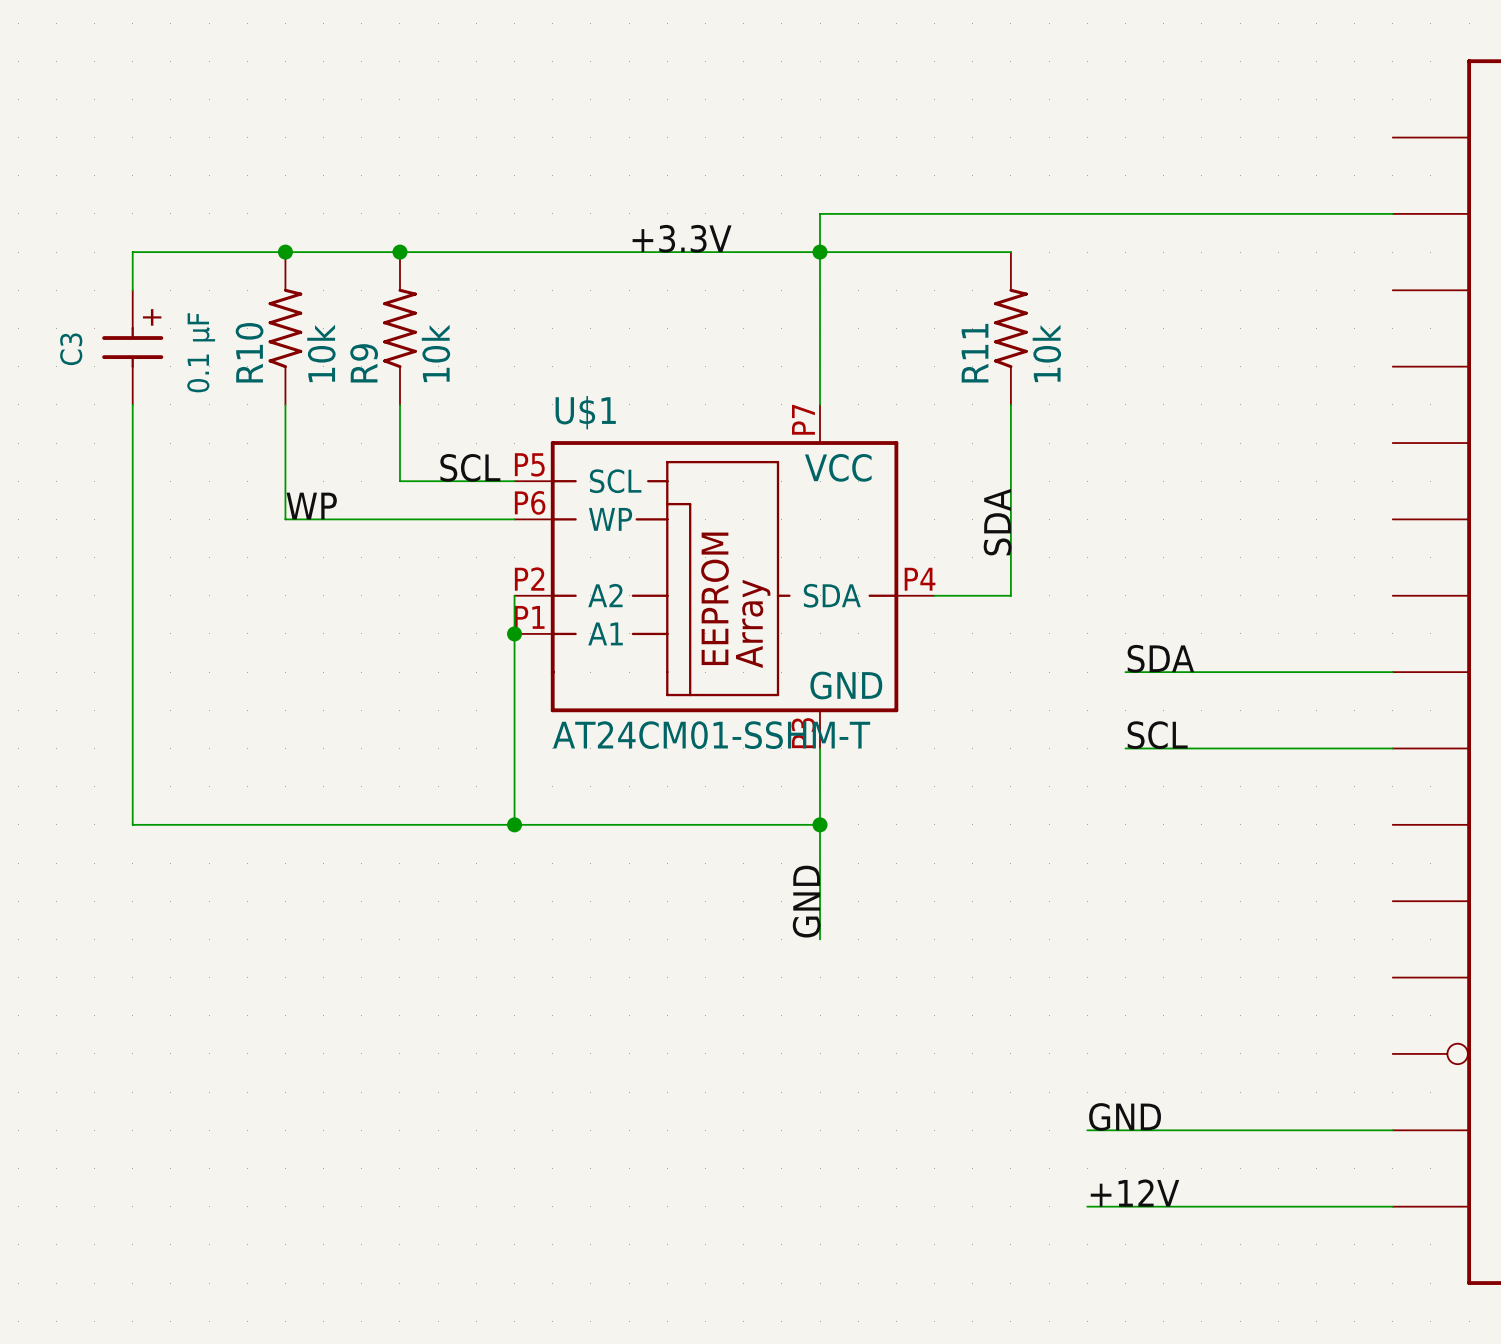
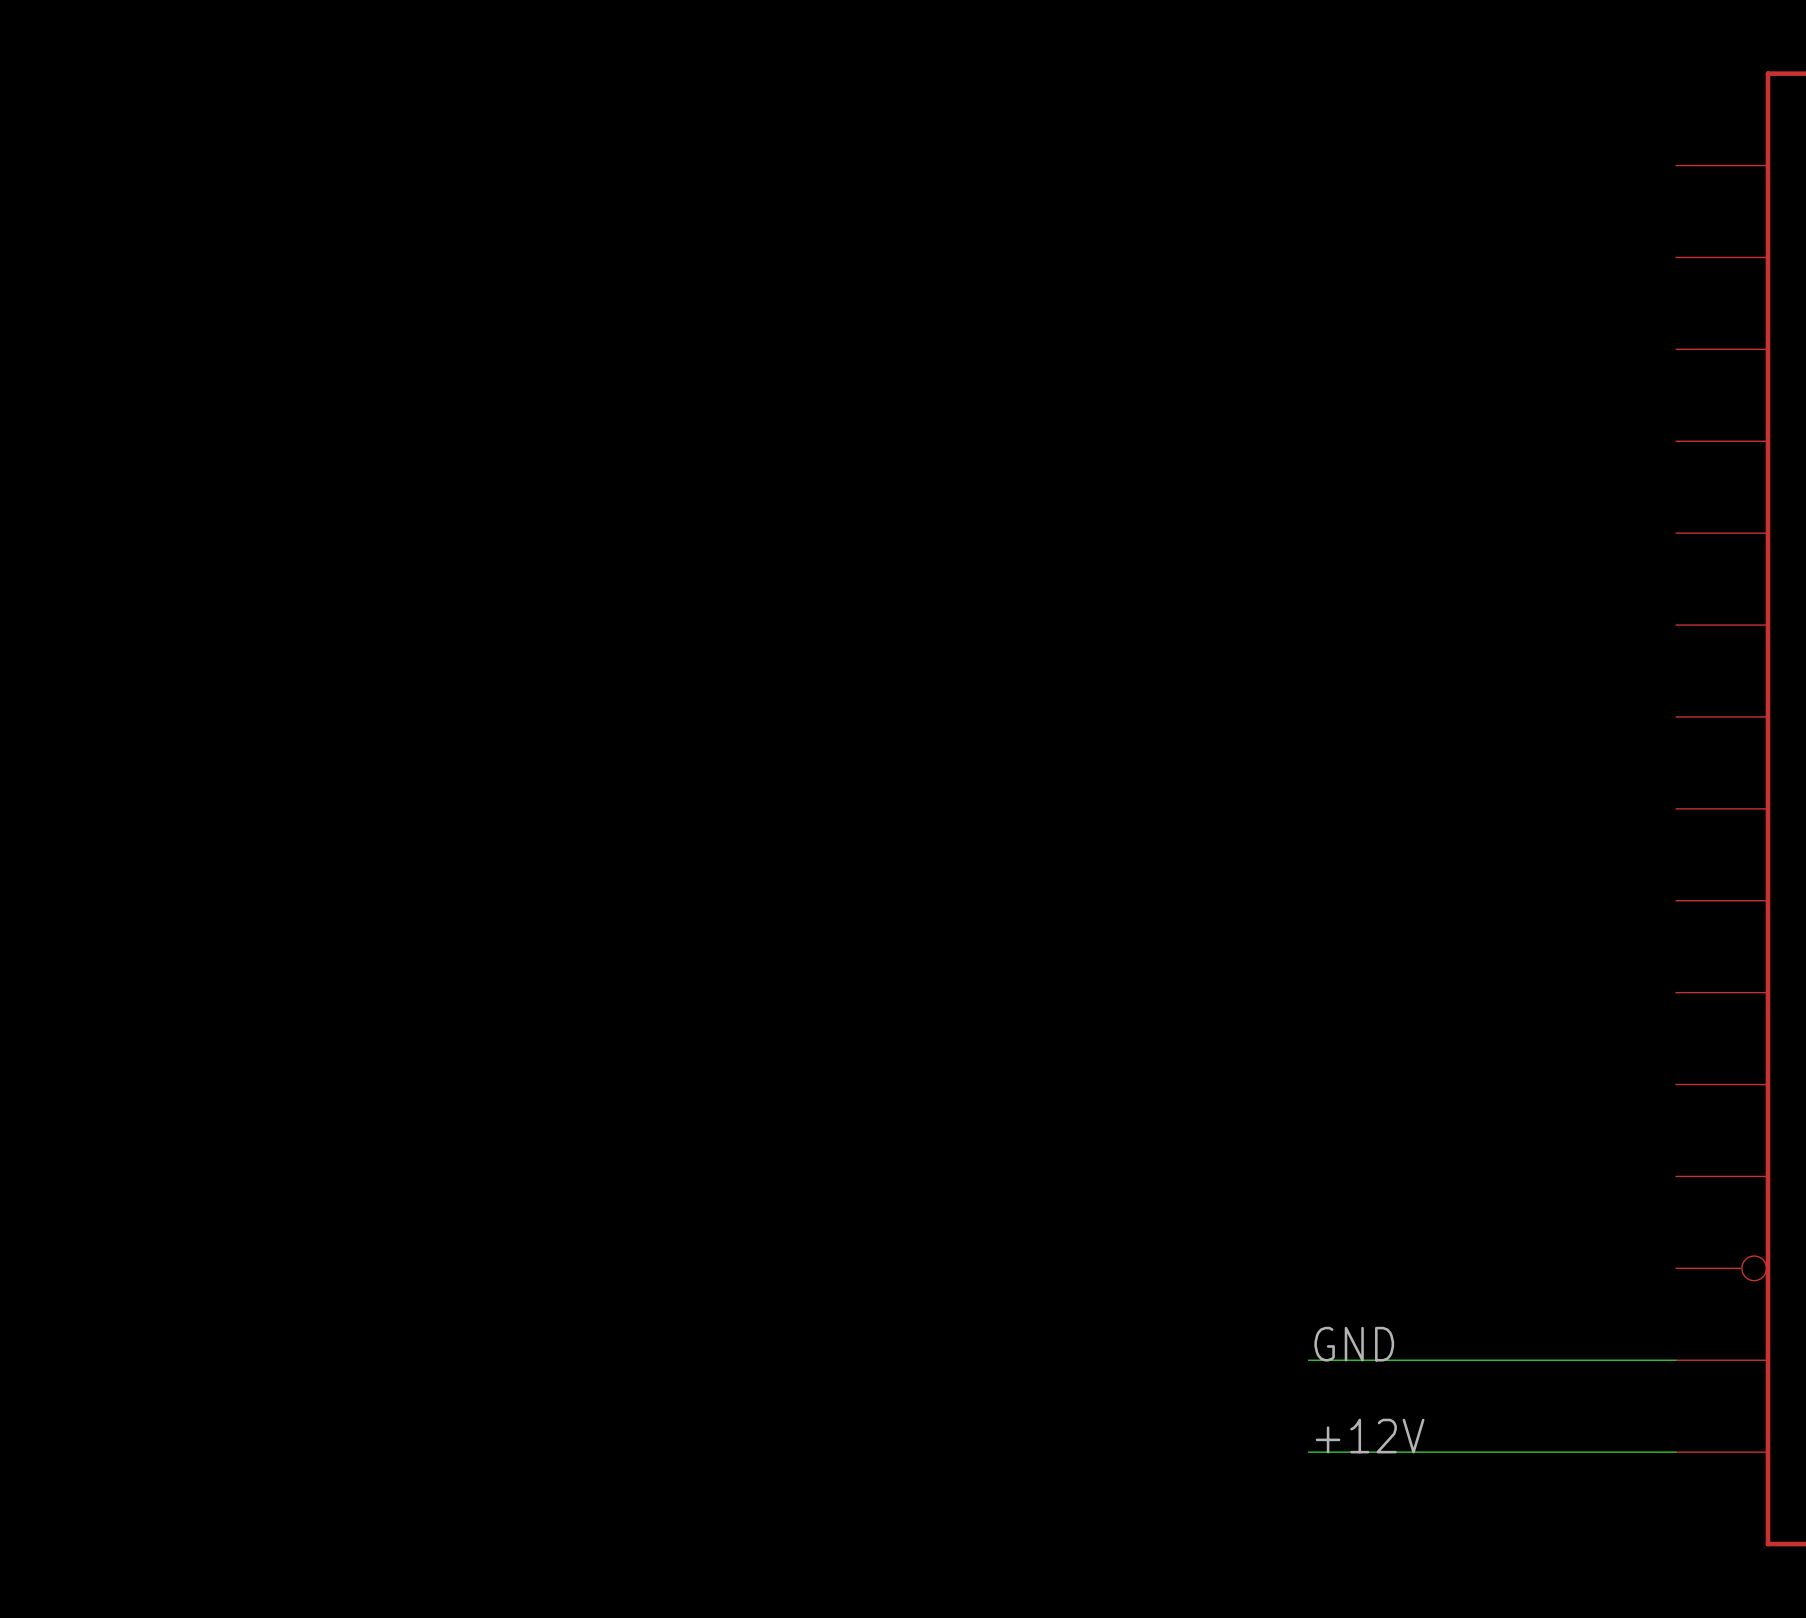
wire: (1392, 213) (820, 213) (820, 404) -> none
label: +3.3V (682, 238) -> none
junction: (285, 252) -> none
junction: (399, 252) -> none
junction: (820, 252) -> none
wire: (1010, 252) (132, 252) (132, 290) -> none
R10: 10k (285, 328) -> none
R9: 10k (399, 328) -> none
R11: 10k (1010, 328) -> none
C3: 0.1 µF (132, 347) -> none
wire: (132, 404) (132, 824) (820, 824) -> none
wire: (285, 404) (285, 519) (514, 519) -> none
wire: (399, 404) (399, 481) (514, 481) -> none
wire: (1010, 404) (1010, 595) (934, 595) -> none
label: SCL (470, 467) -> none
label: WP (311, 506) -> none
label: SDA (997, 522) -> none
U$1: AT24CM01-SSHM-T (724, 576) -> none
wire: (514, 595) (514, 824) -> none
junction: (514, 633) -> none
label: SDA (1160, 658) -> none
wire: (1125, 672) (1392, 672) -> none
label: SCL (1157, 735) -> none
wire: (820, 748) (820, 939) -> none
wire: (1125, 748) (1392, 748) -> none
junction: (514, 824) -> none
junction: (820, 824) -> none
label: GND (806, 901) -> none

